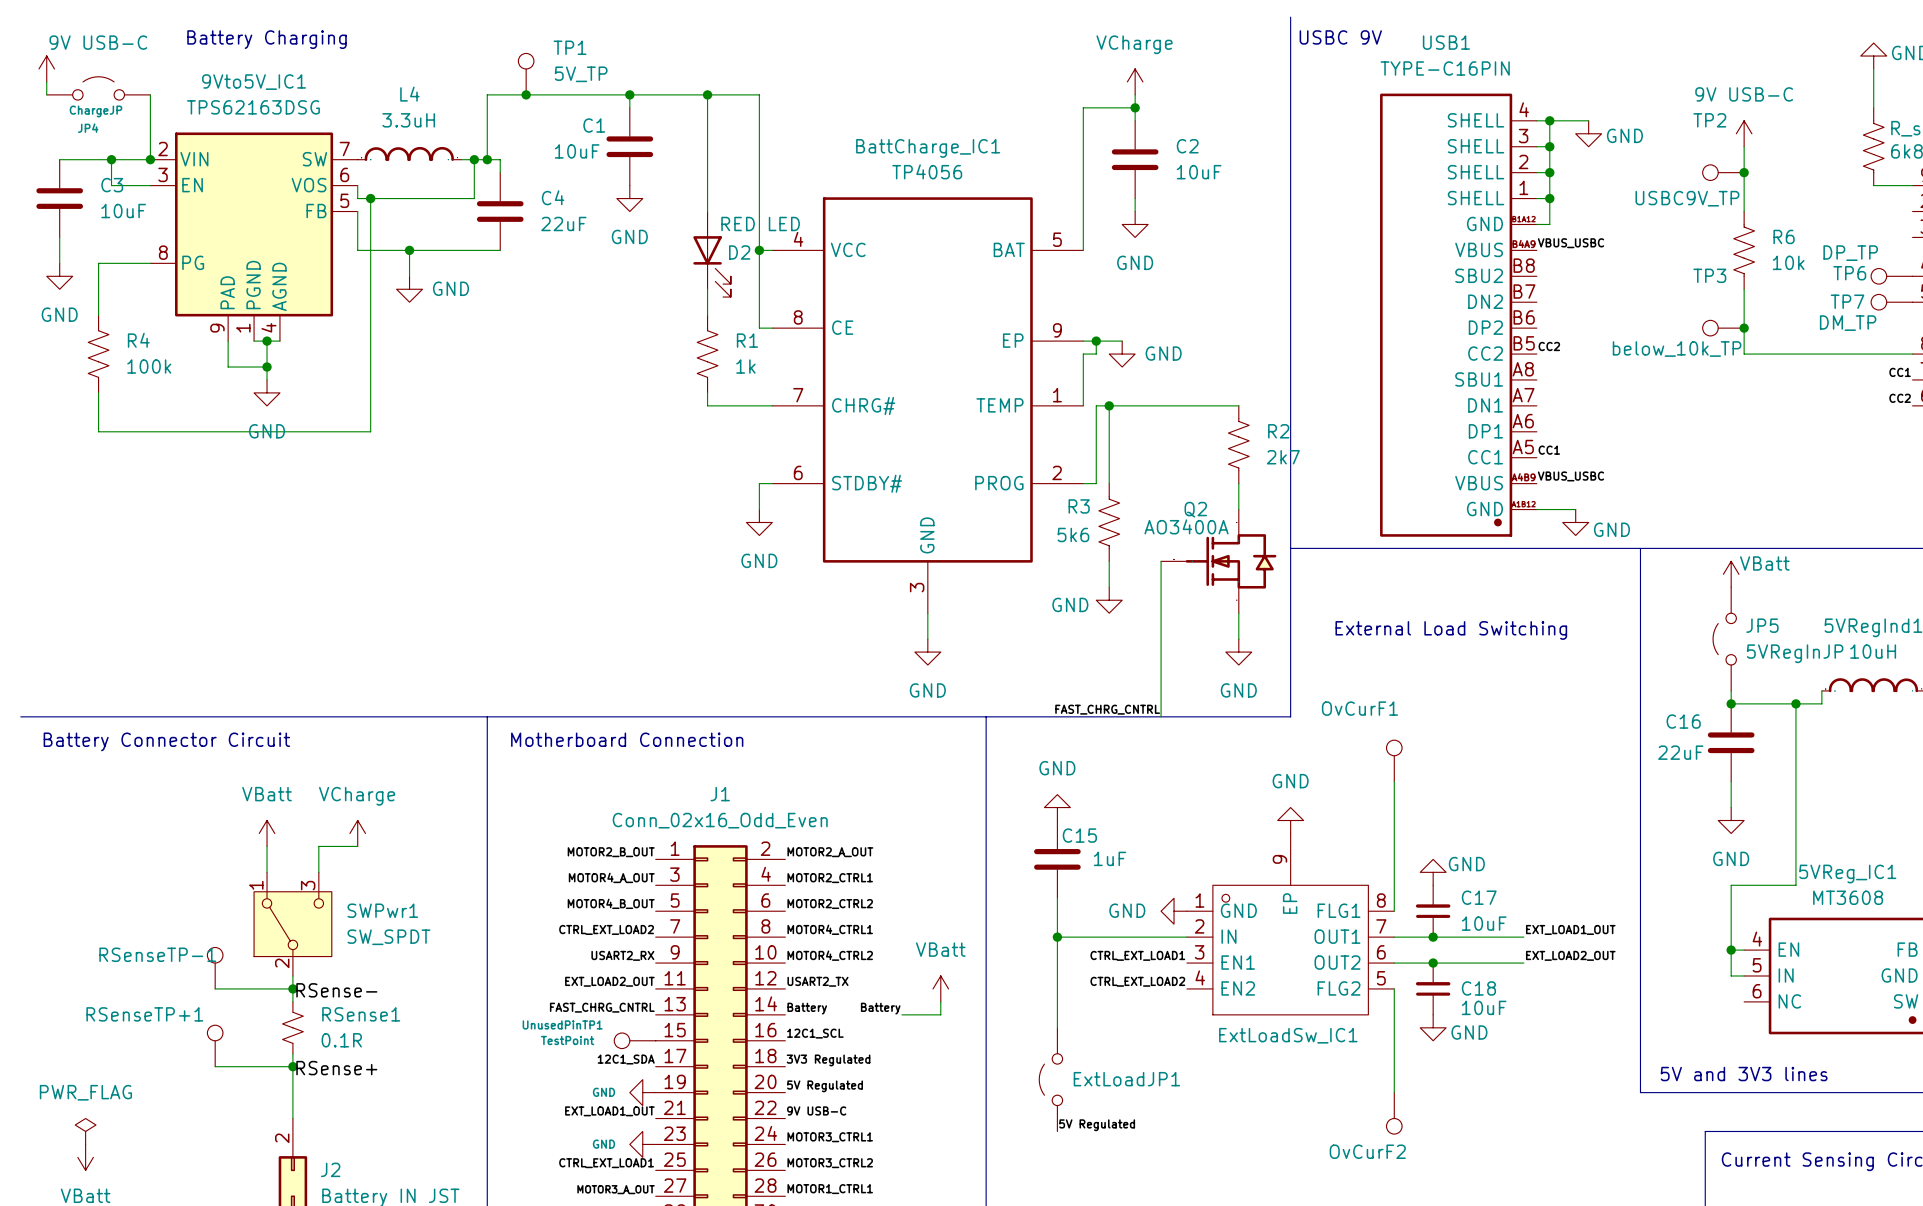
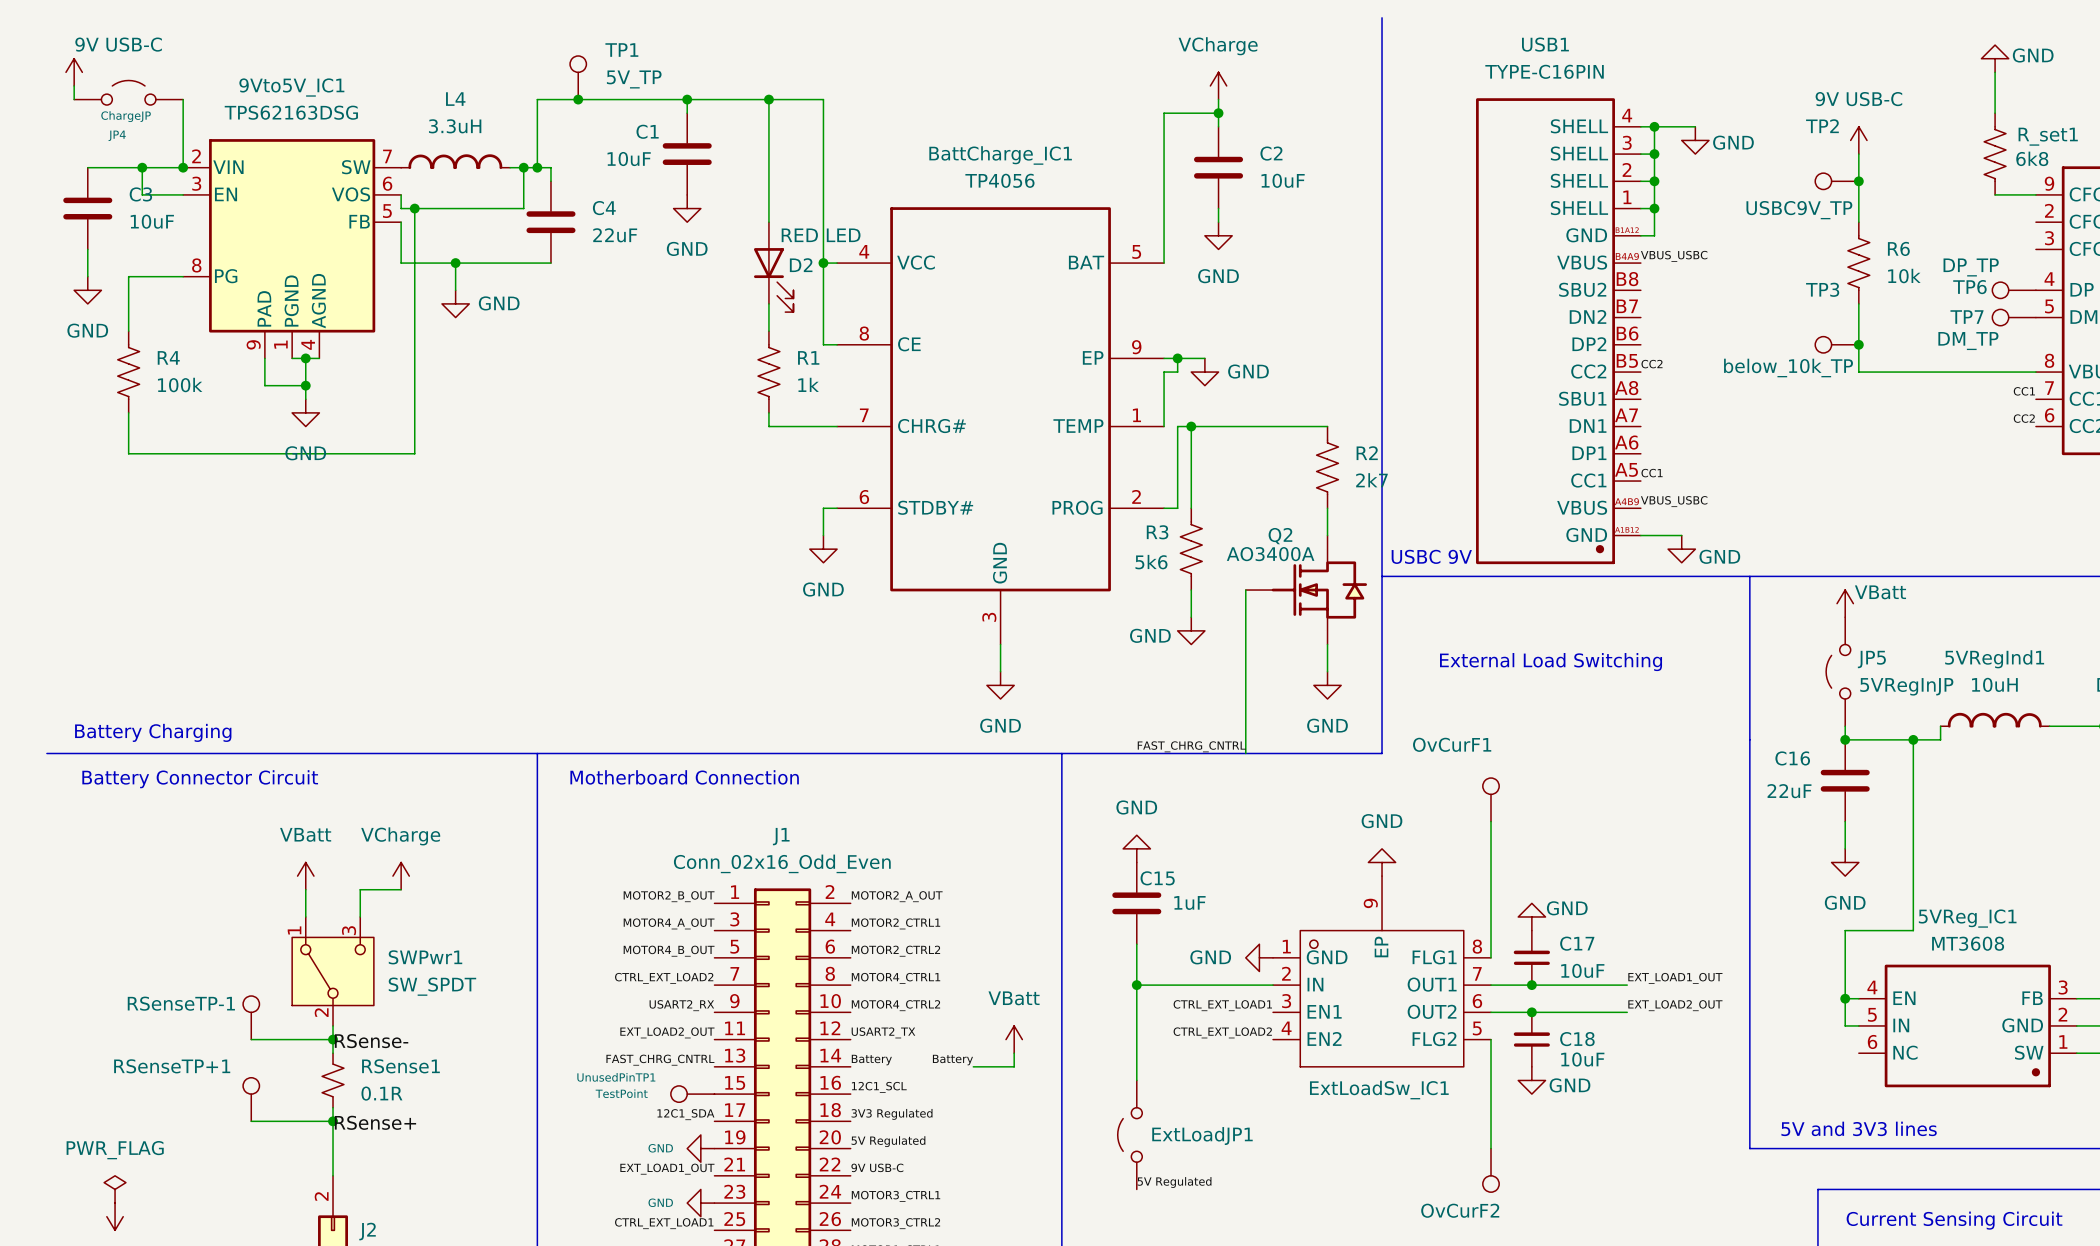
text: USBC 9V (1340, 37) -> none
text: Battery Charging (267, 39) -> none
text: none -> USBC 9V (1431, 556)
text: none -> Battery Charging (153, 732)

